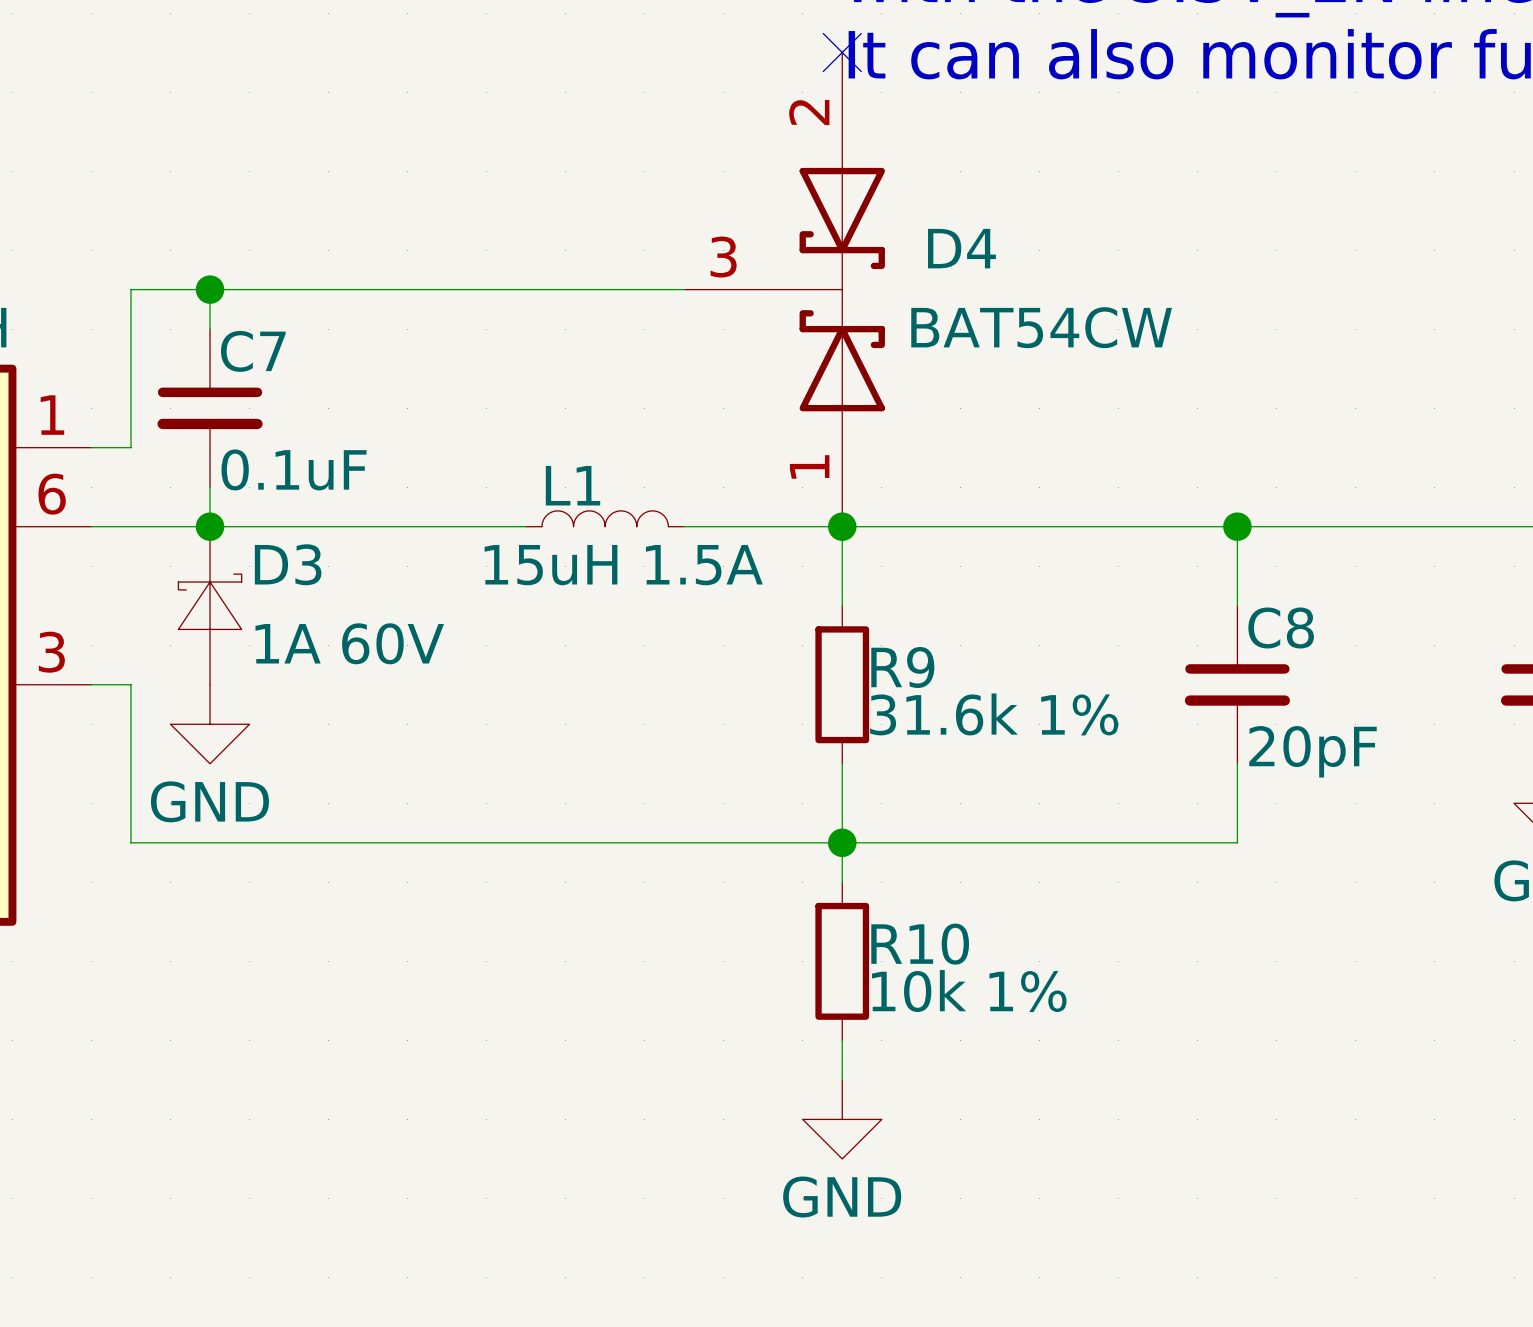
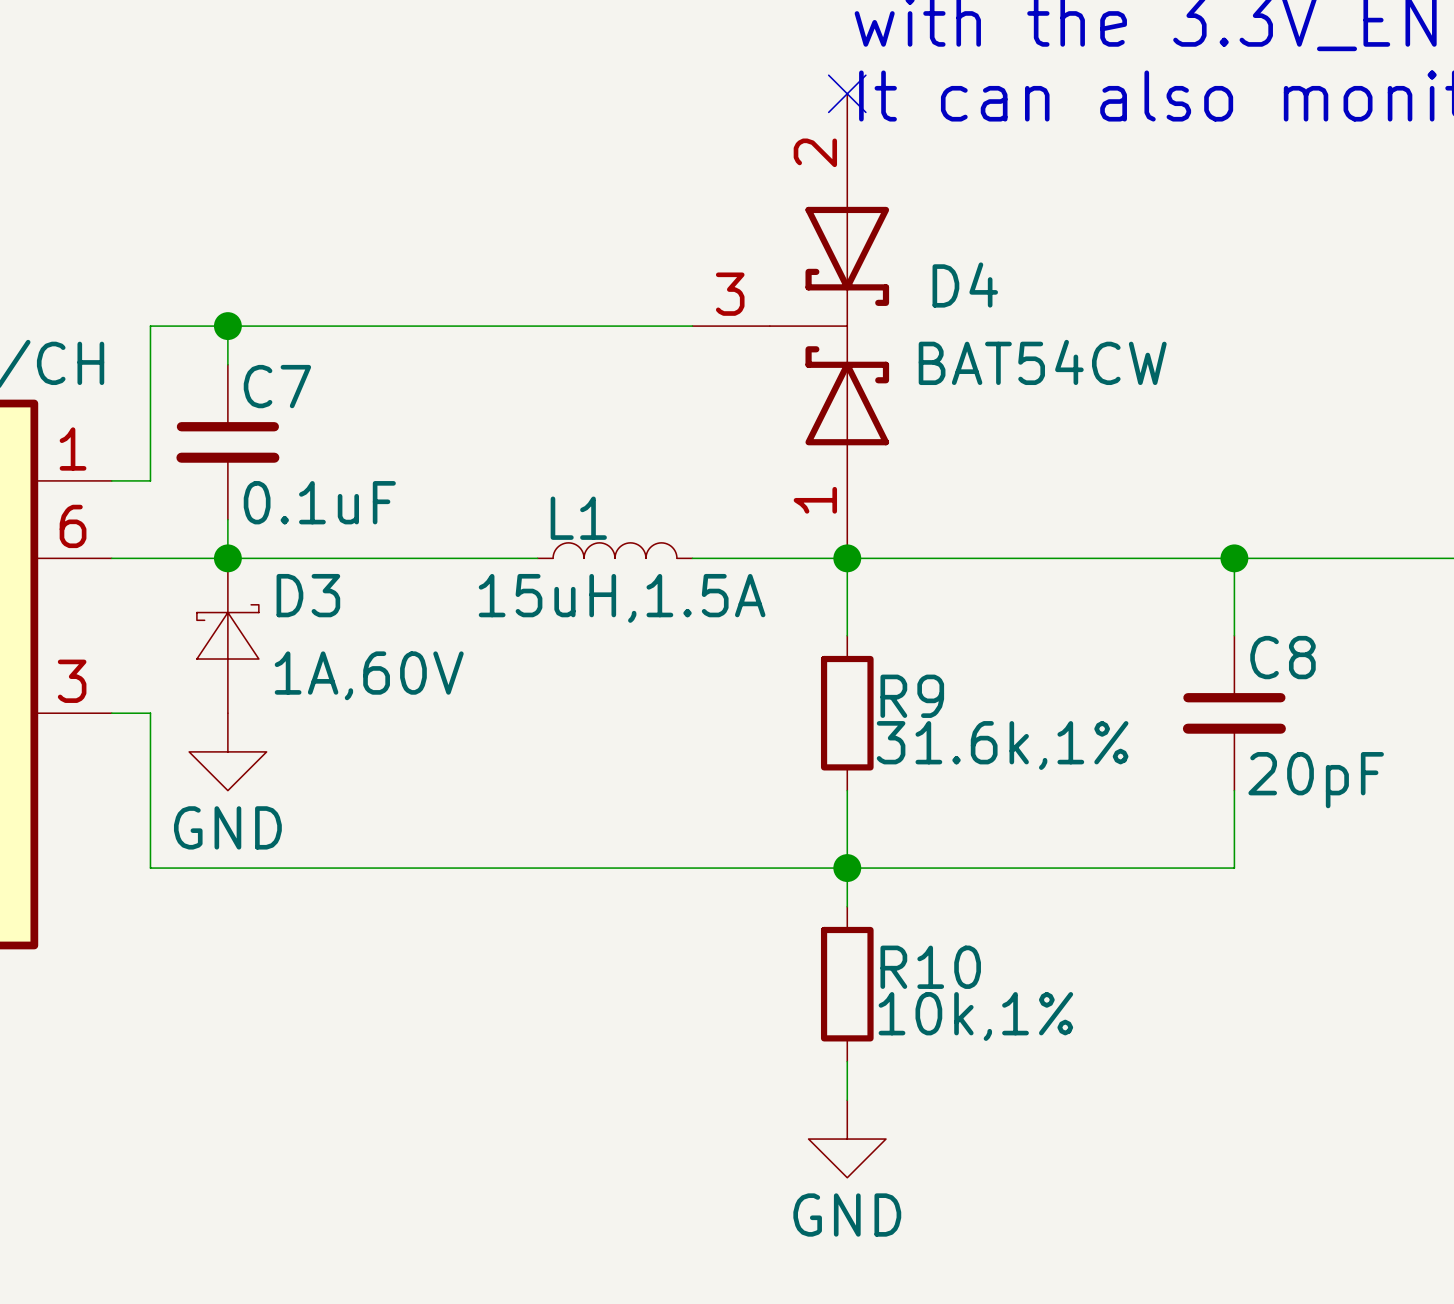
L1 value: 15uH 1.5A (623, 565) -> 15uH,1.5A (622, 598)
D3 value: 1A 60V (349, 643) -> 1A,60V (369, 675)
R9 value: 31.6k 1% (994, 714) -> 31.6k,1% (1002, 745)
R10 value: 10k 1% (969, 991) -> 10k,1% (975, 1016)

